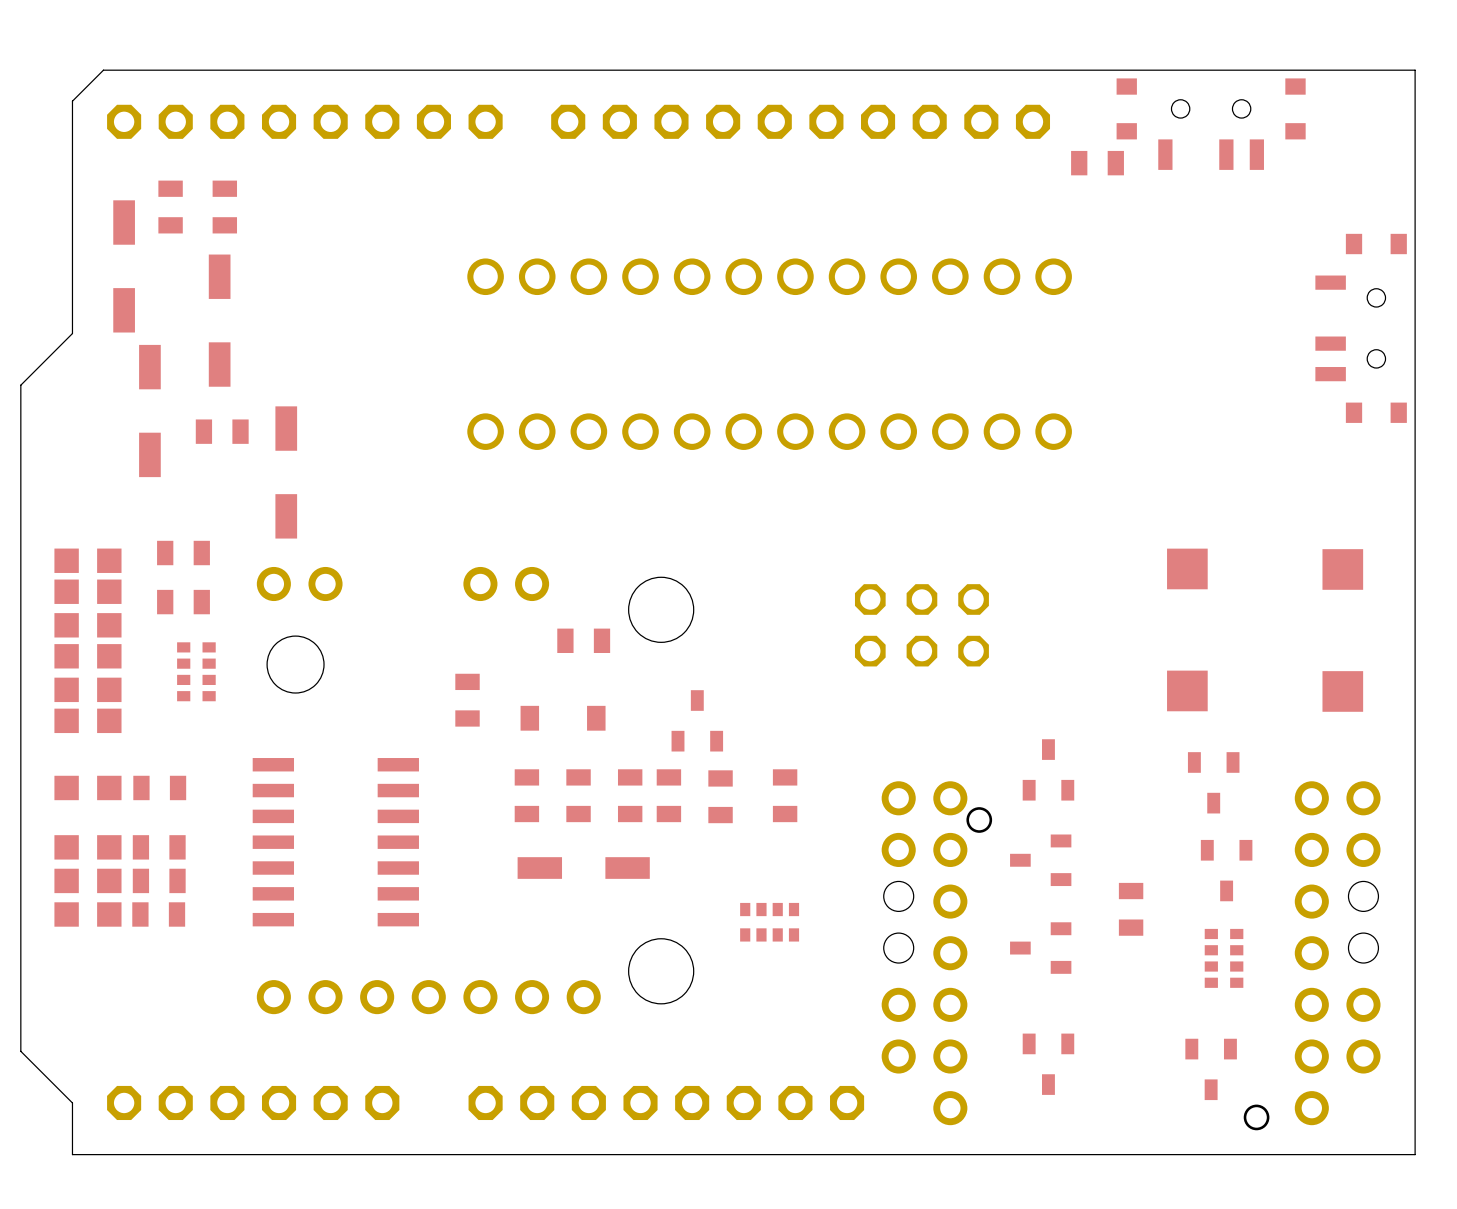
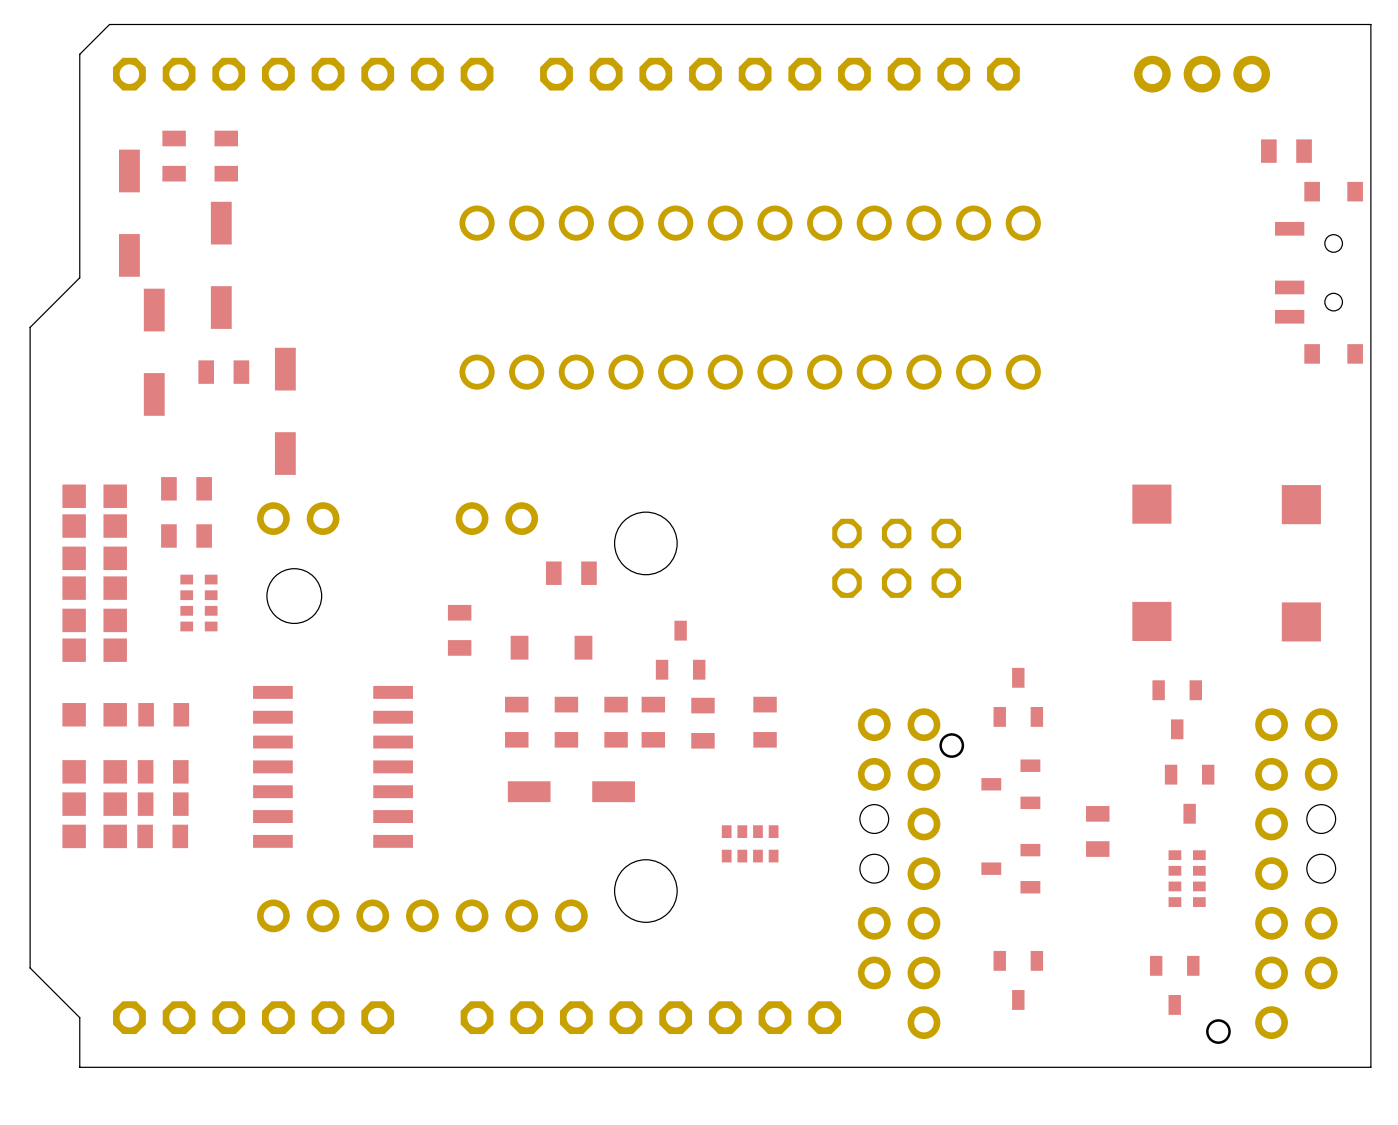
part: none -> (1202, 74)
part: (1211, 124) -> none
part position: (1097, 163) -> (1286, 151)

